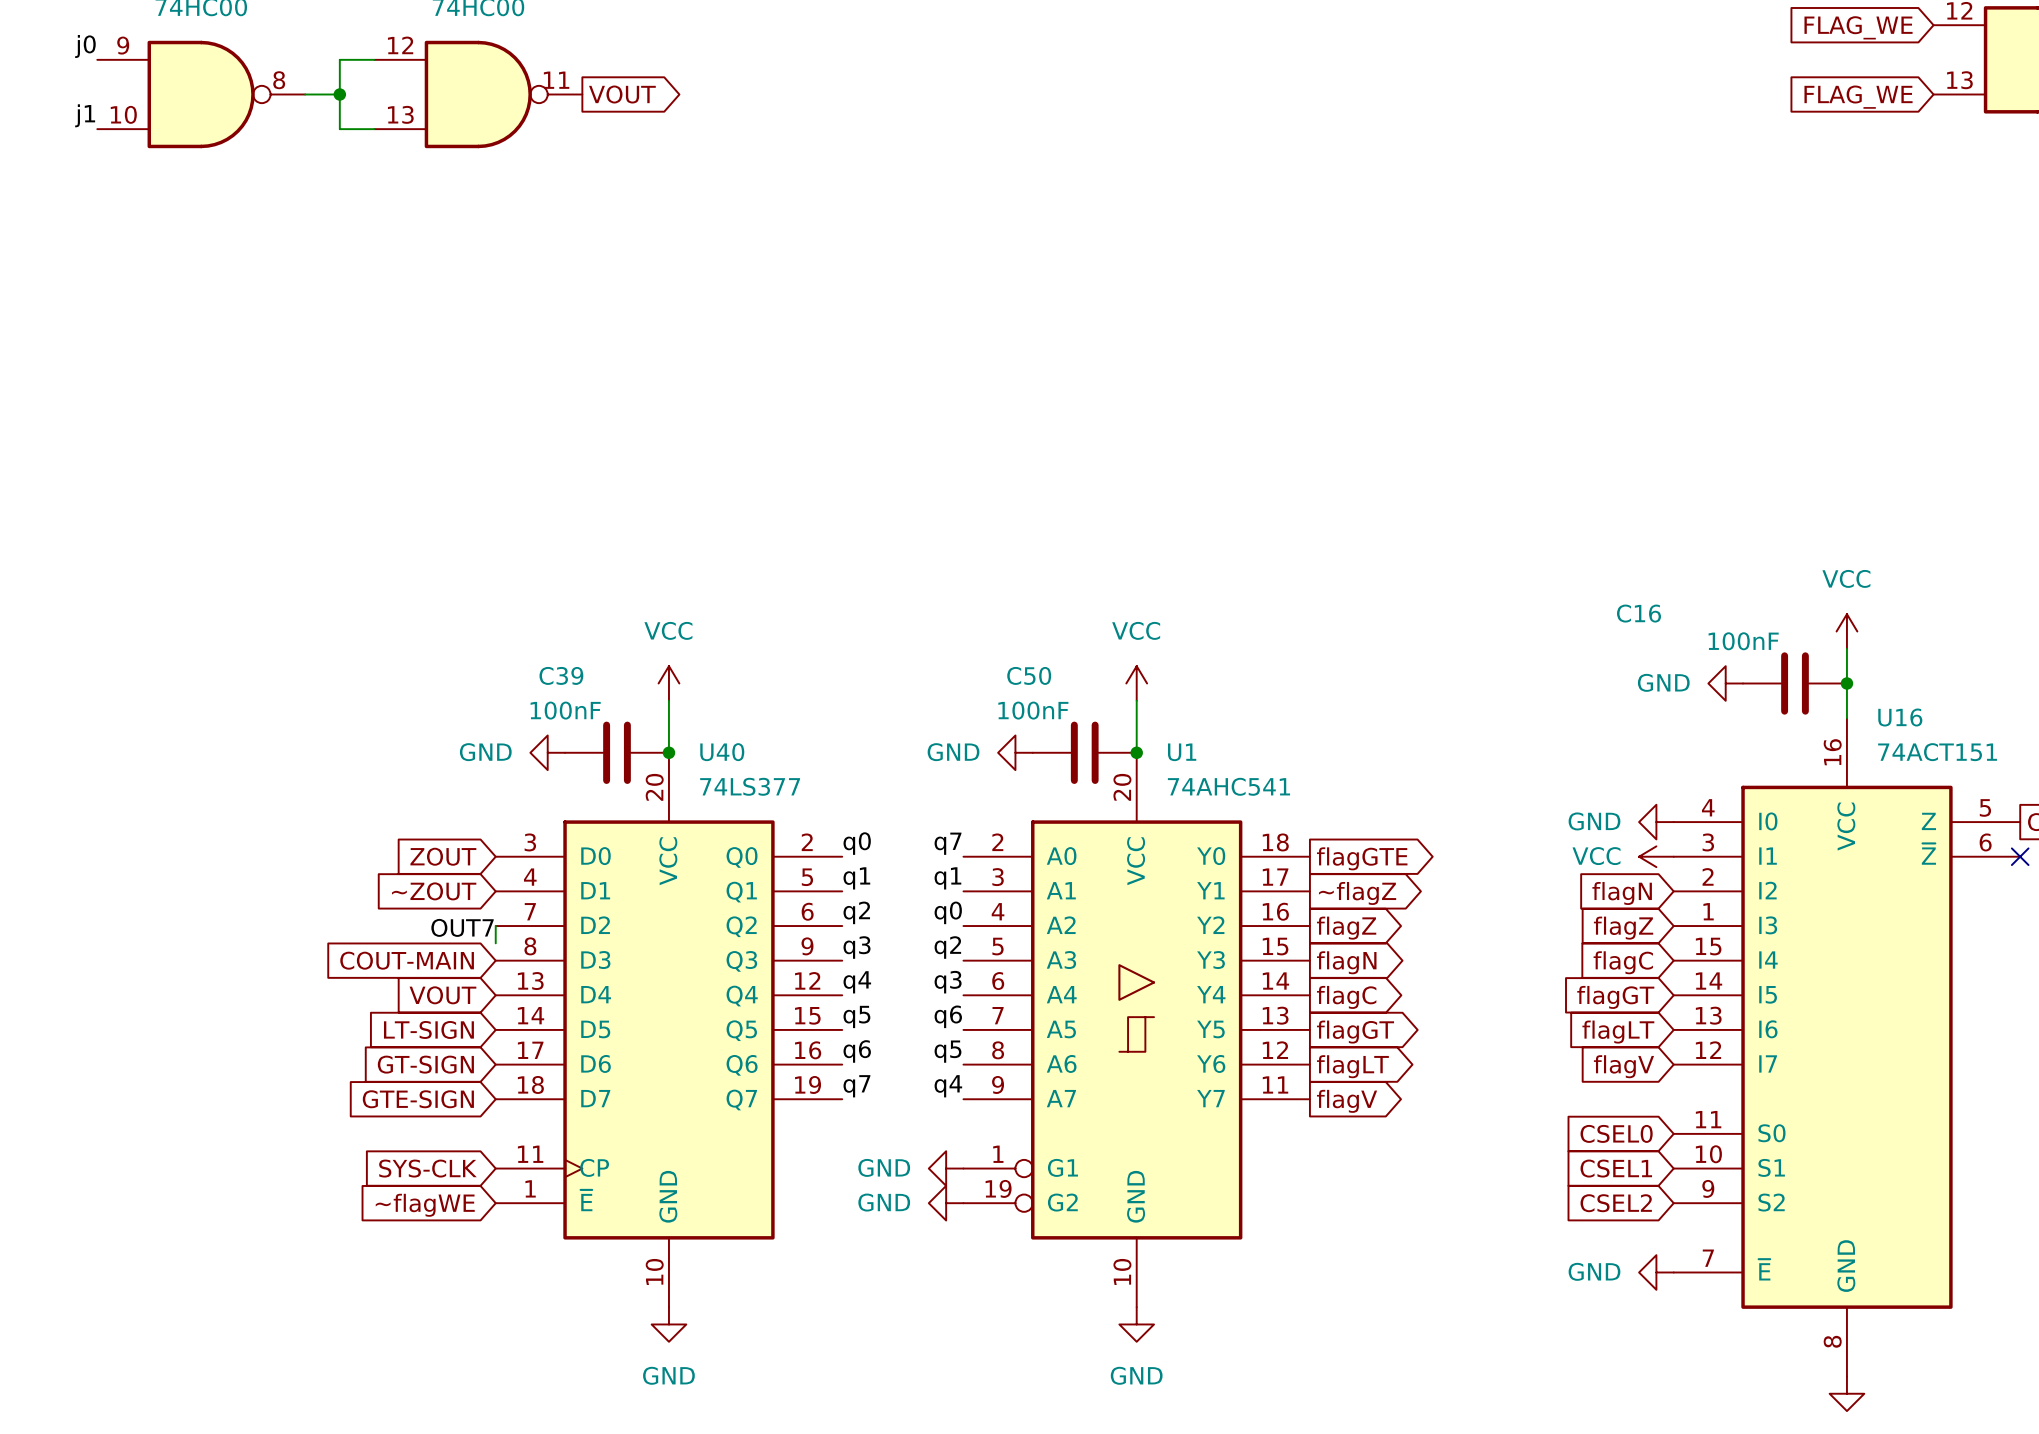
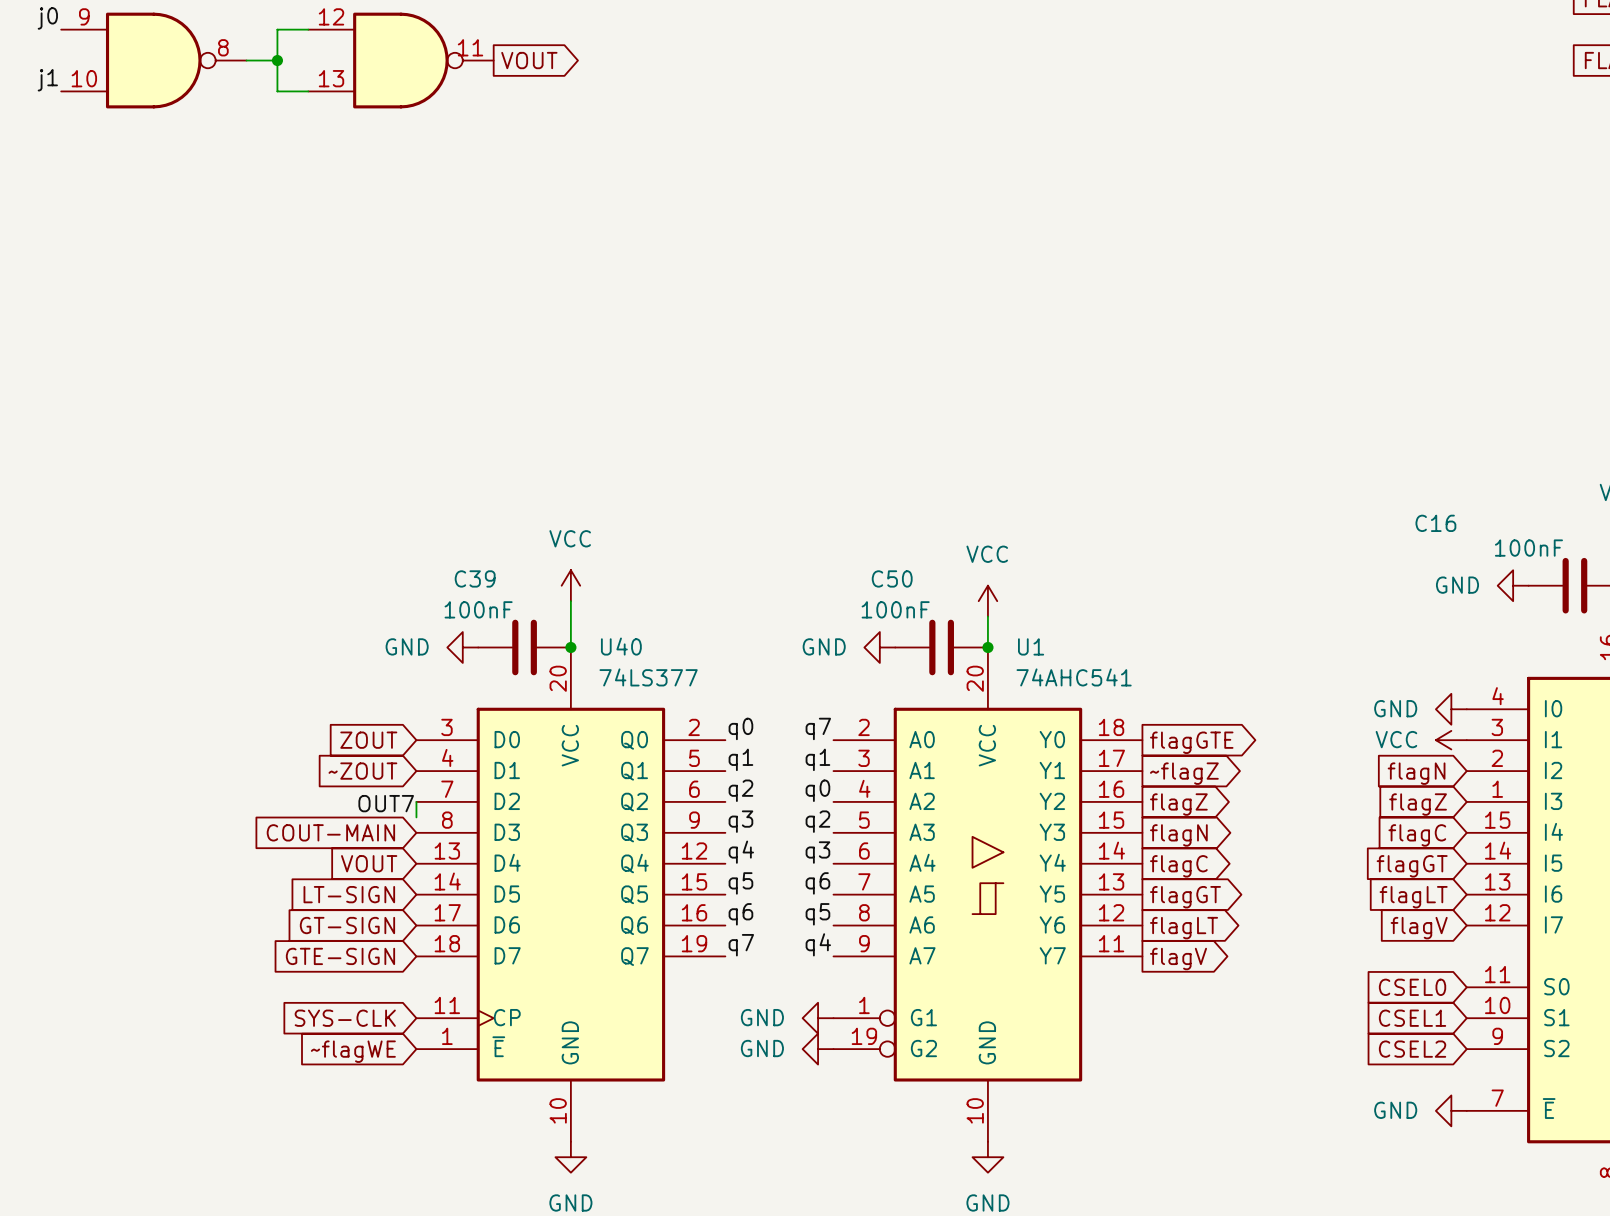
power symbol position: VCC (1136, 683) -> VCC (987, 601)

